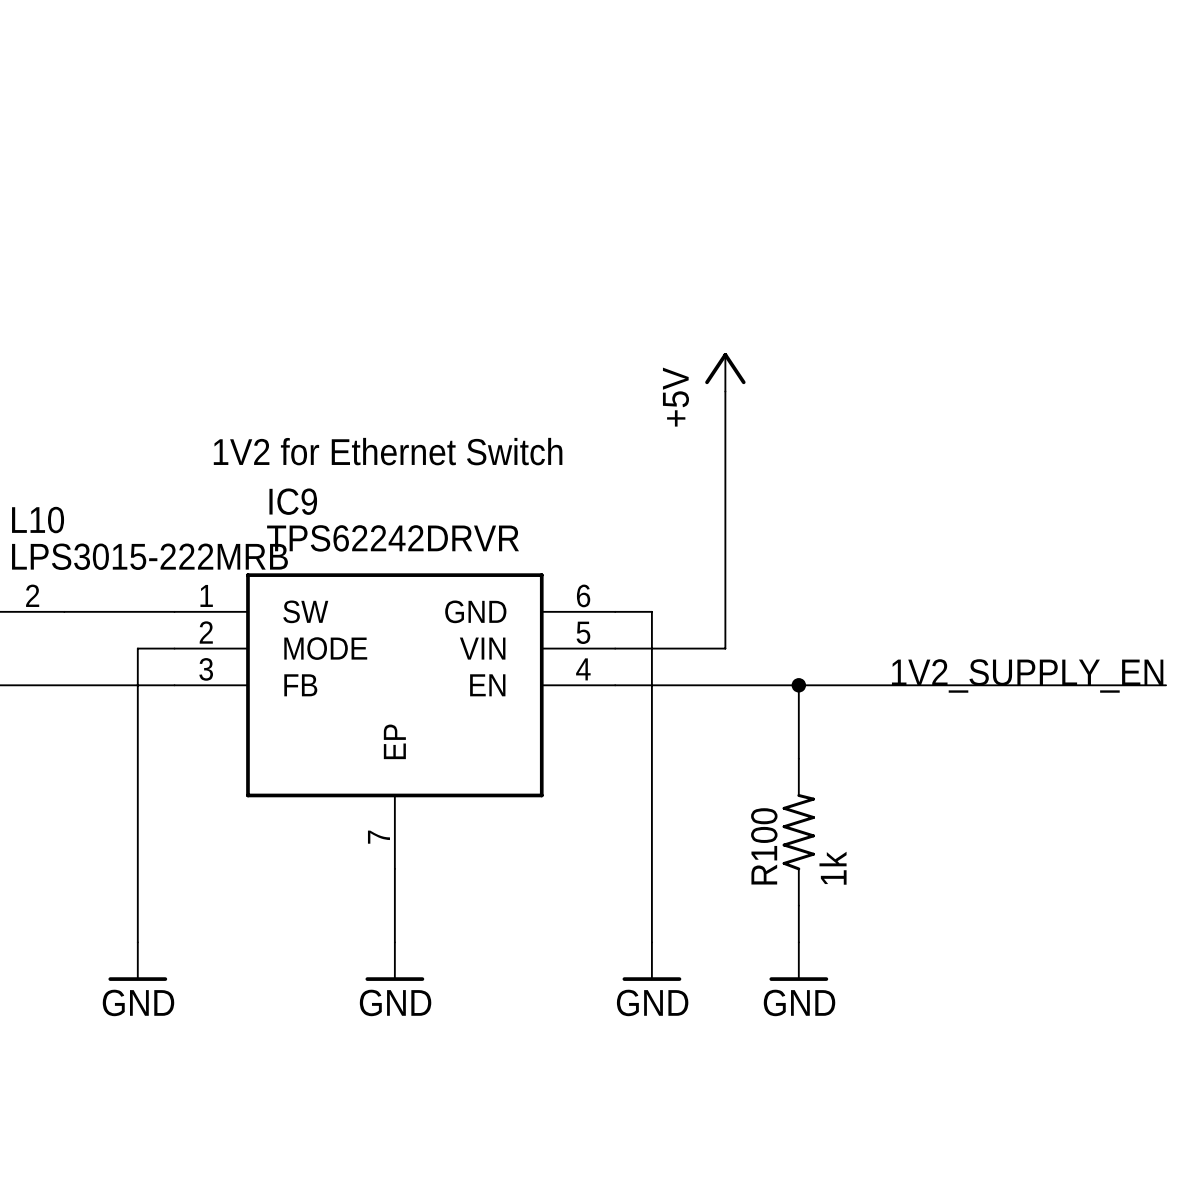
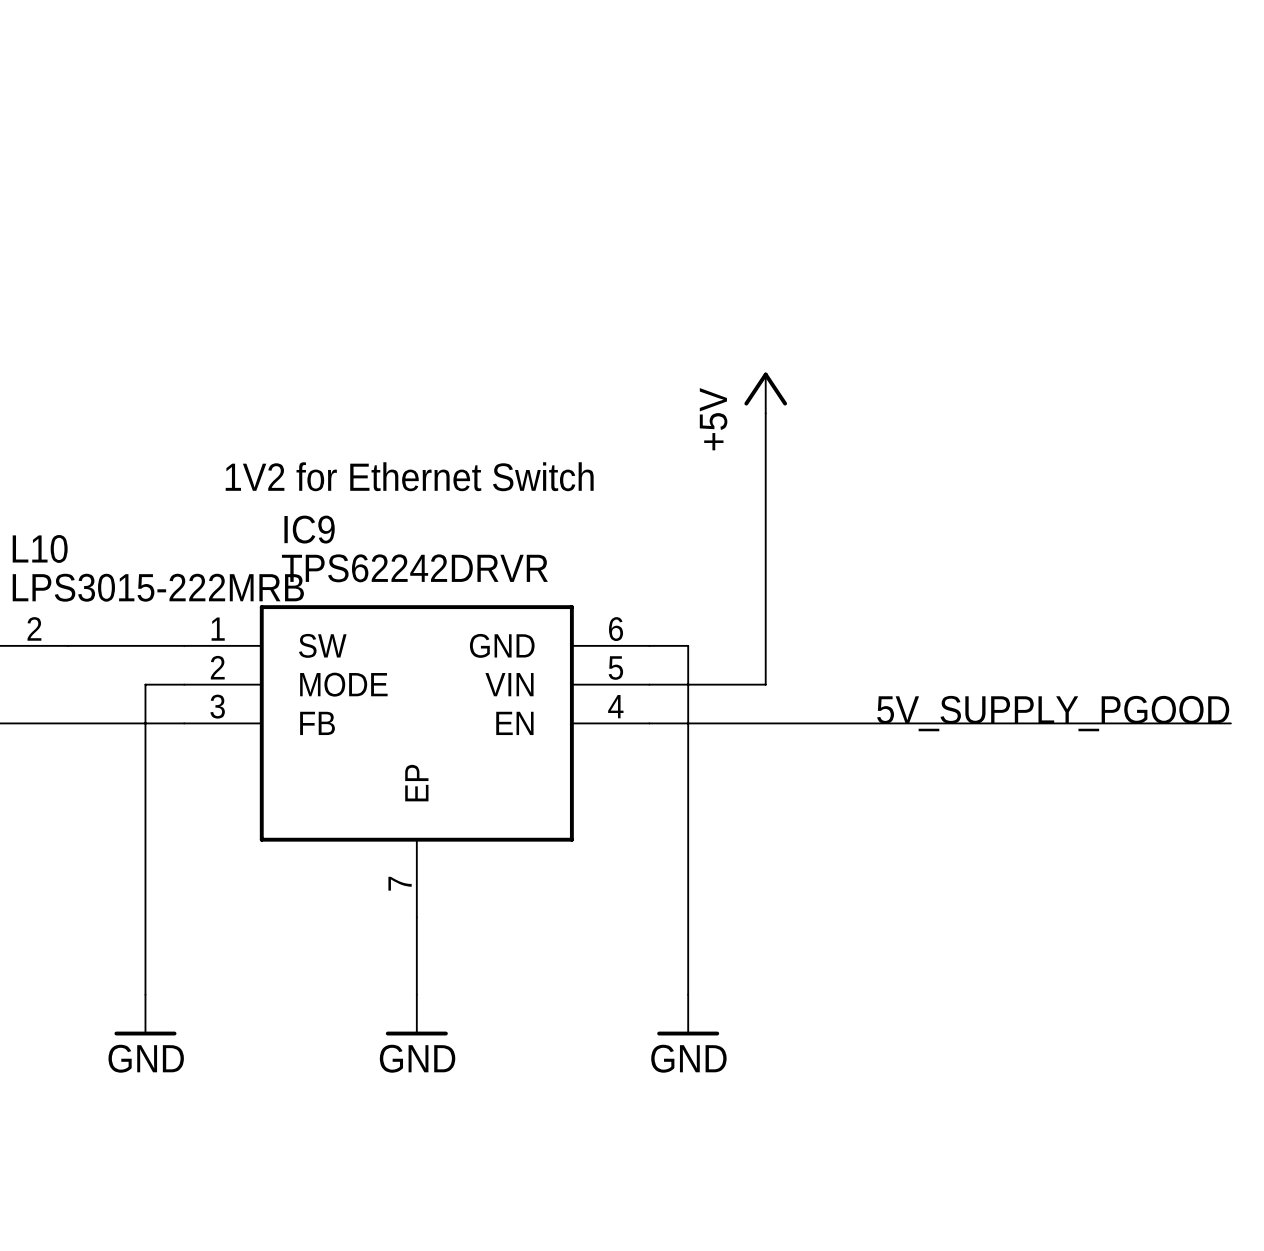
label: 1V2_SUPPLY_EN (1027, 675) -> 5V_SUPPLY_PGOOD (1053, 713)
wire: (798, 685) (798, 758) -> none
junction: (798, 685) -> none
R100: 1k (798, 832) -> none
wire: (798, 905) (798, 942) -> none
power symbol: GND (798, 961) -> none

